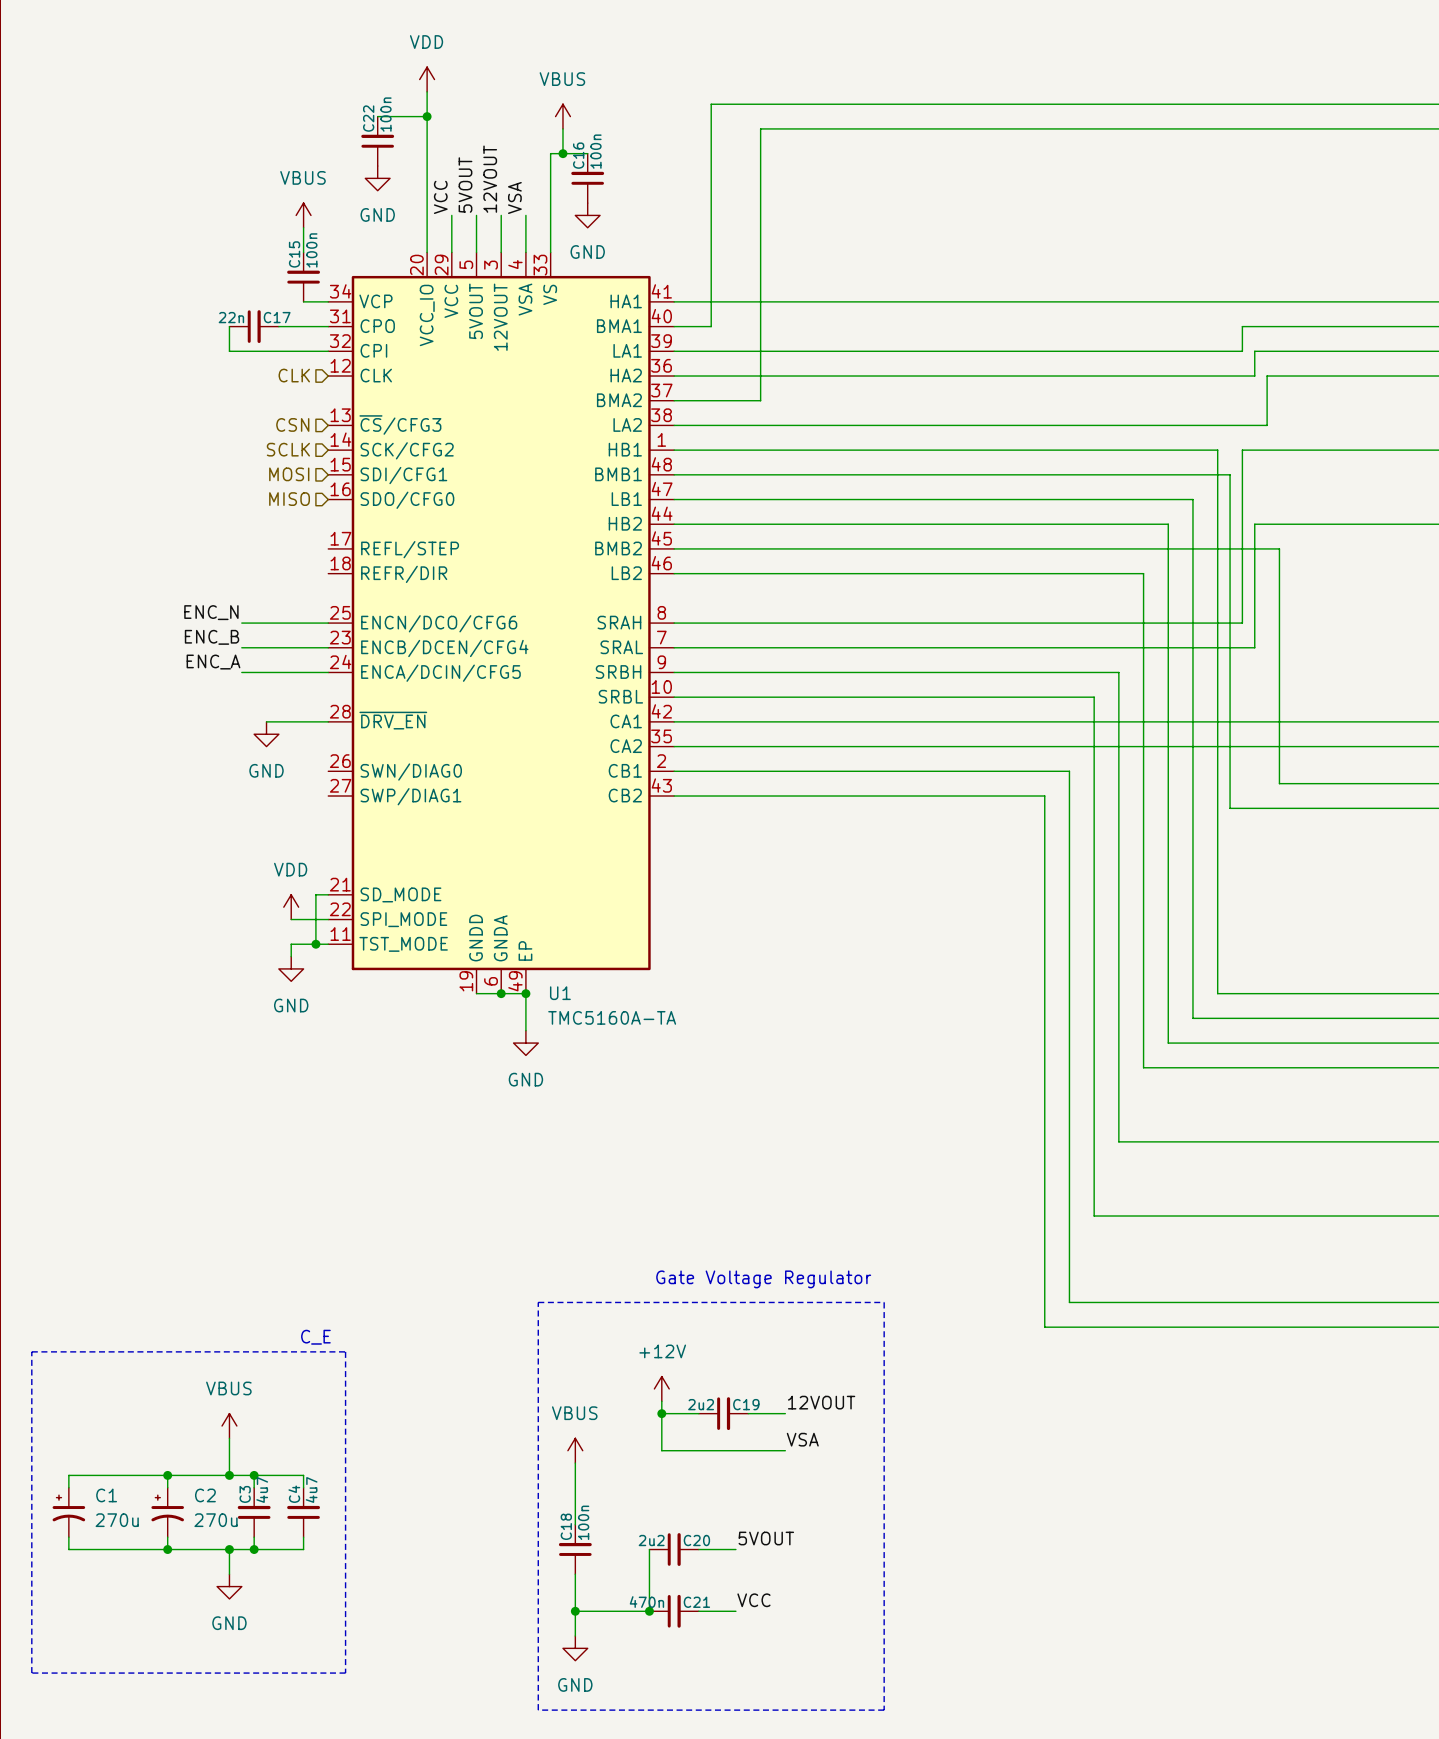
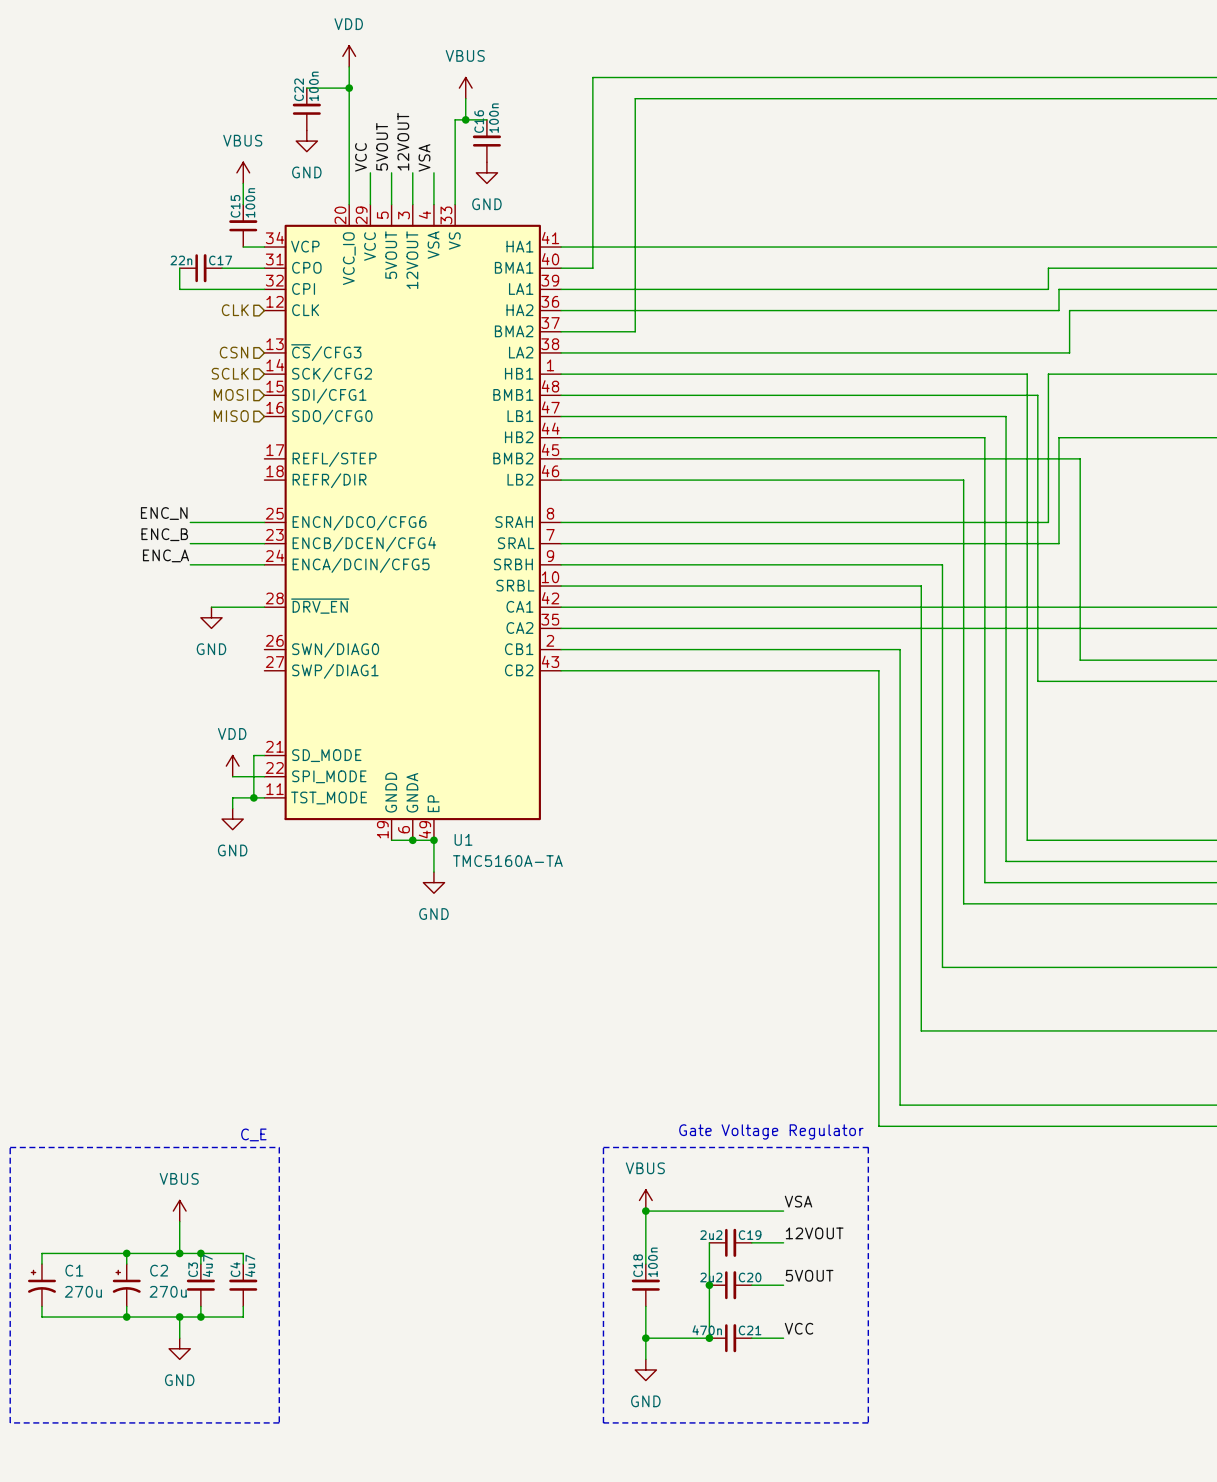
text position: Gate Voltage Regulator (763, 1279) -> Gate Voltage Regulator (771, 1131)
line: (538, 1302) (884, 1302) (884, 1710) (538, 1710) (538, 1302) -> none
line: none -> (603, 1147) (868, 1147) (868, 1422) (603, 1422) (603, 1147)
power symbol: +12V (661, 1388) -> none
wire: (661, 1401) (661, 1450) (785, 1450) -> none
label position: 12VOUT (821, 1402) -> 12VOUT (814, 1233)
wire: (661, 1413) (698, 1413) -> none
junction: (661, 1413) -> none
C19 position: (723, 1413) -> (730, 1242)
wire: (748, 1413) (785, 1413) -> (751, 1242) (783, 1242)
junction: none -> (645, 1211)
wire: none -> (783, 1211) (645, 1211) (645, 1264)
label position: VSA (802, 1439) -> VSA (798, 1201)
power symbol position: VBUS (575, 1450) -> VBUS (645, 1200)
wire: (575, 1463) (575, 1524) -> none
wire: none -> (709, 1242) (709, 1338) (645, 1338)
junction: none -> (709, 1285)
label position: 5VOUT (766, 1538) -> 5VOUT (809, 1275)
C18 position: (575, 1549) -> (645, 1285)
wire: (649, 1549) (649, 1611) (575, 1611) -> none
C20 position: (674, 1549) -> (730, 1285)
wire: (698, 1549) (735, 1549) -> (751, 1285) (783, 1285)
wire: (575, 1574) (575, 1636) -> (645, 1306) (645, 1359)
junction: none -> (645, 1338)
junction: none -> (709, 1338)
label position: VCC (753, 1600) -> VCC (799, 1328)
junction: (575, 1611) -> none
junction: (649, 1611) -> none
C21 position: (674, 1611) -> (730, 1338)
wire: (698, 1611) (735, 1611) -> (751, 1338) (783, 1338)
power symbol position: GND (575, 1648) -> GND (645, 1369)

